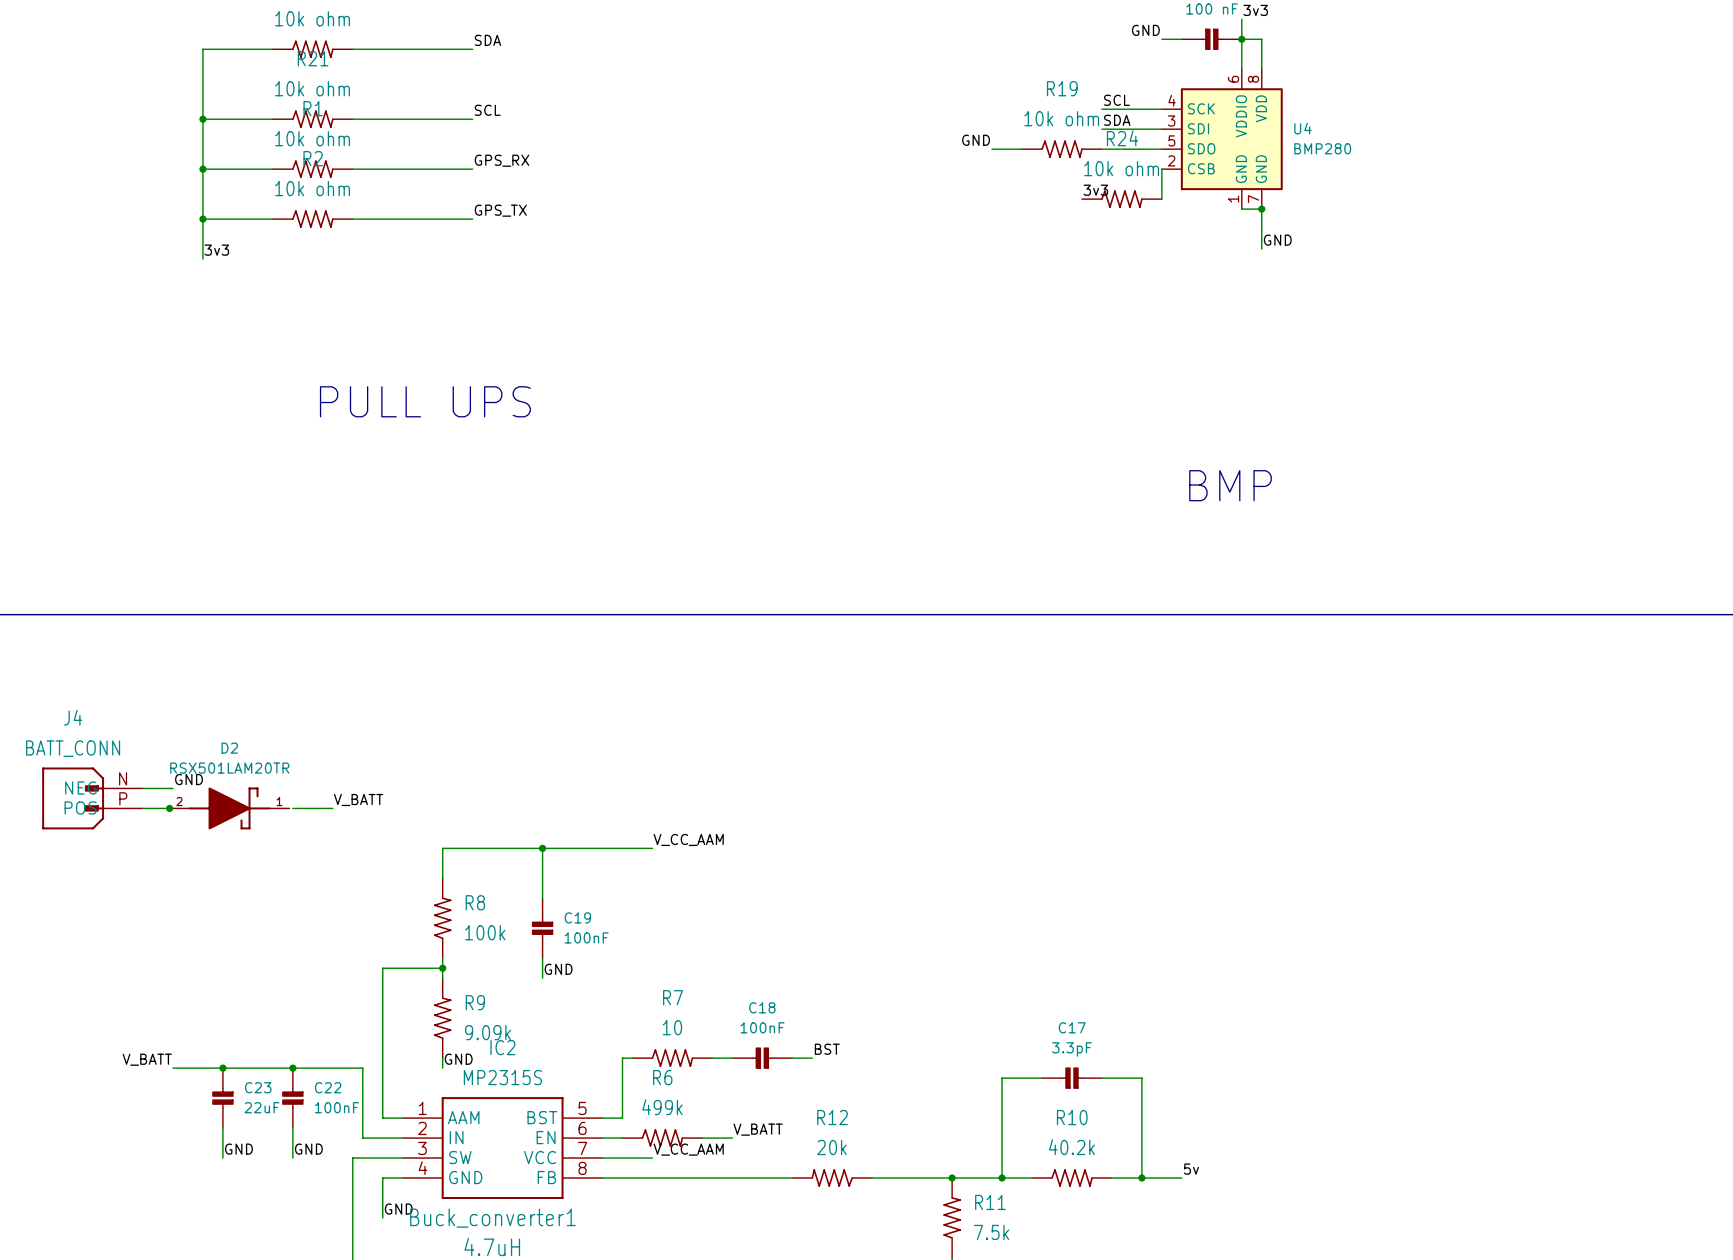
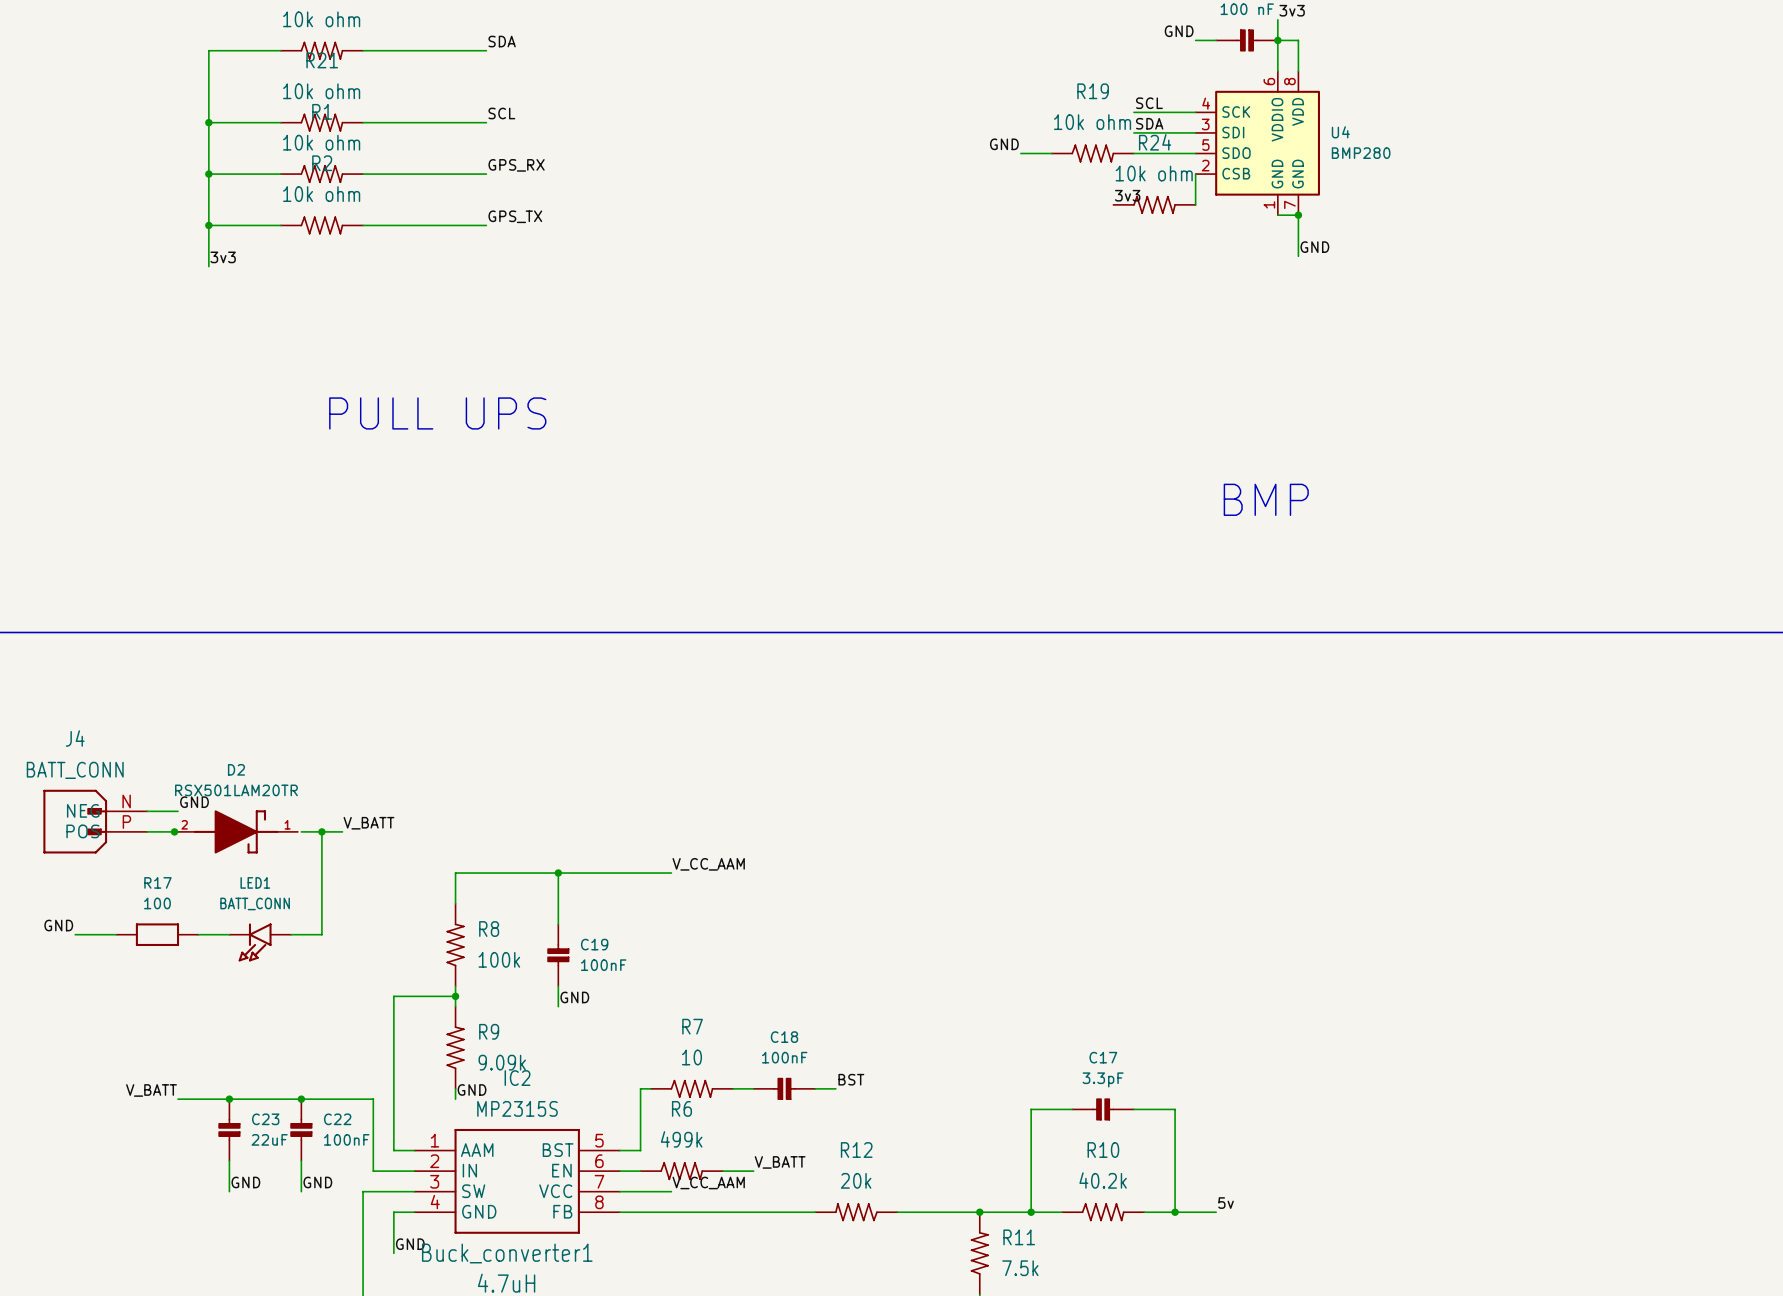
wire: none -> (321, 831) (321, 934) (291, 934)
junction: none -> (321, 831)
label: none -> GND (58, 925)
wire: none -> (75, 934) (116, 934)
R17: none -> 100 (157, 934)
wire: none -> (198, 934) (229, 934)
LED1: none -> BATT_CONN (260, 942)

